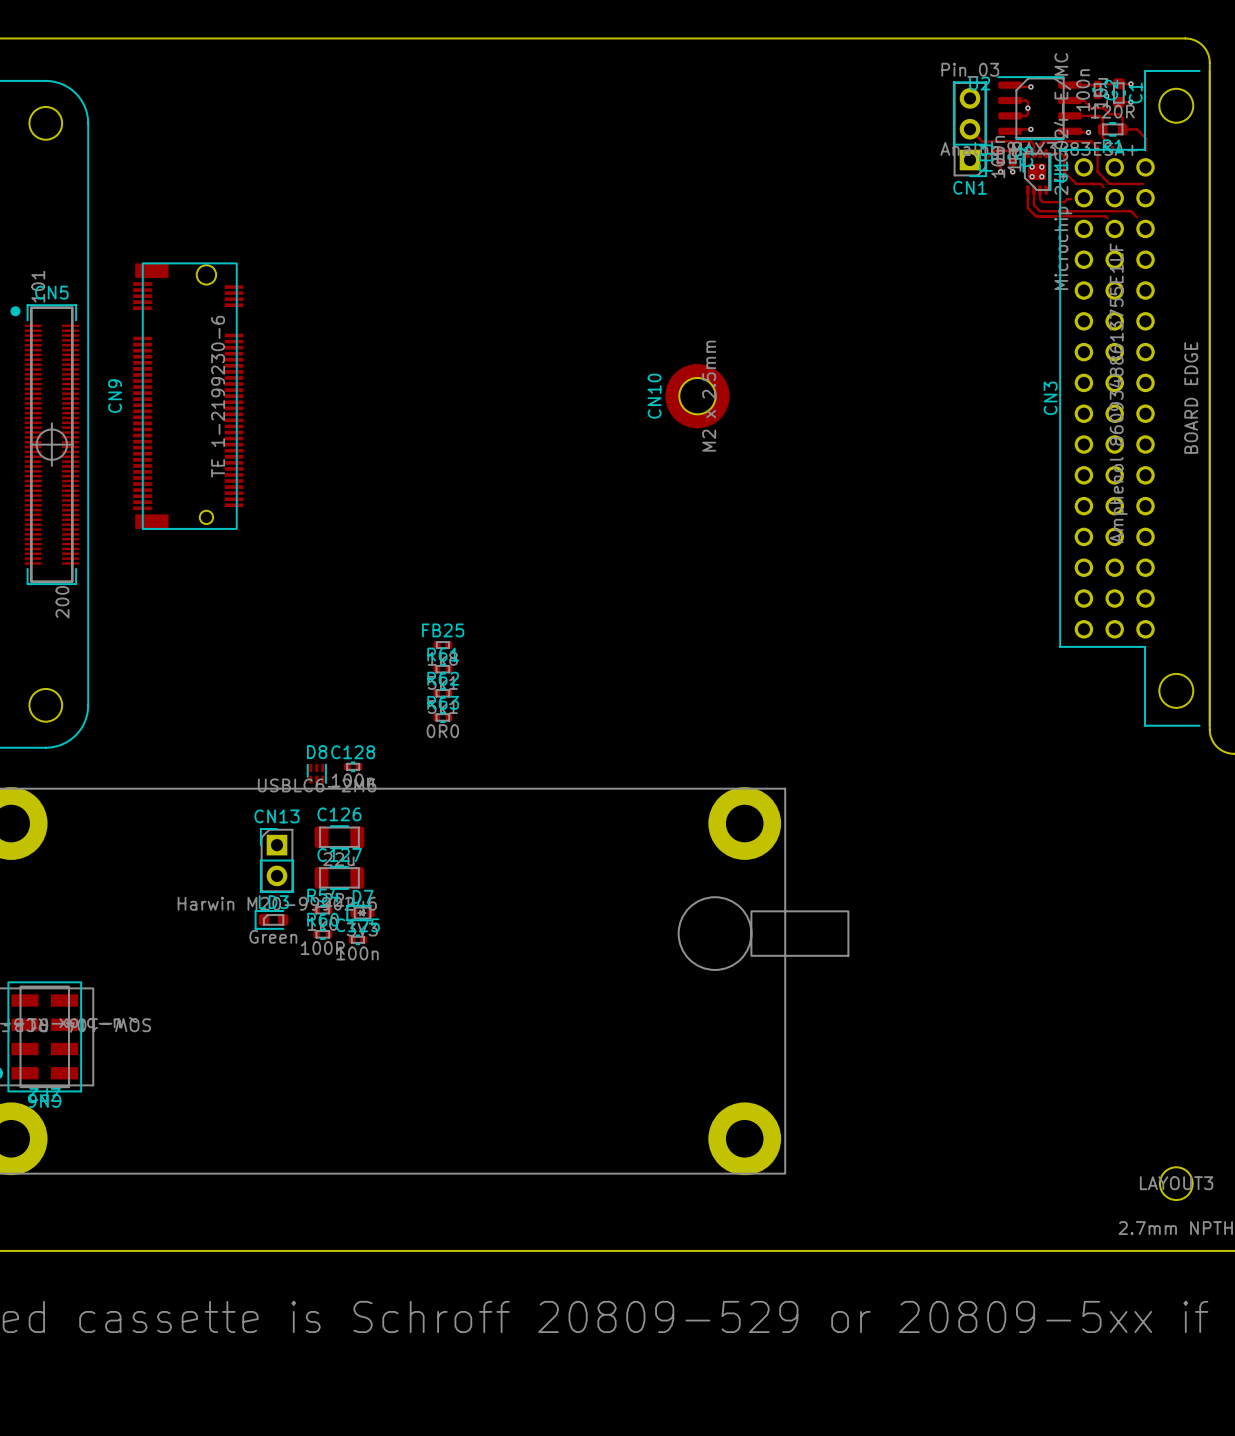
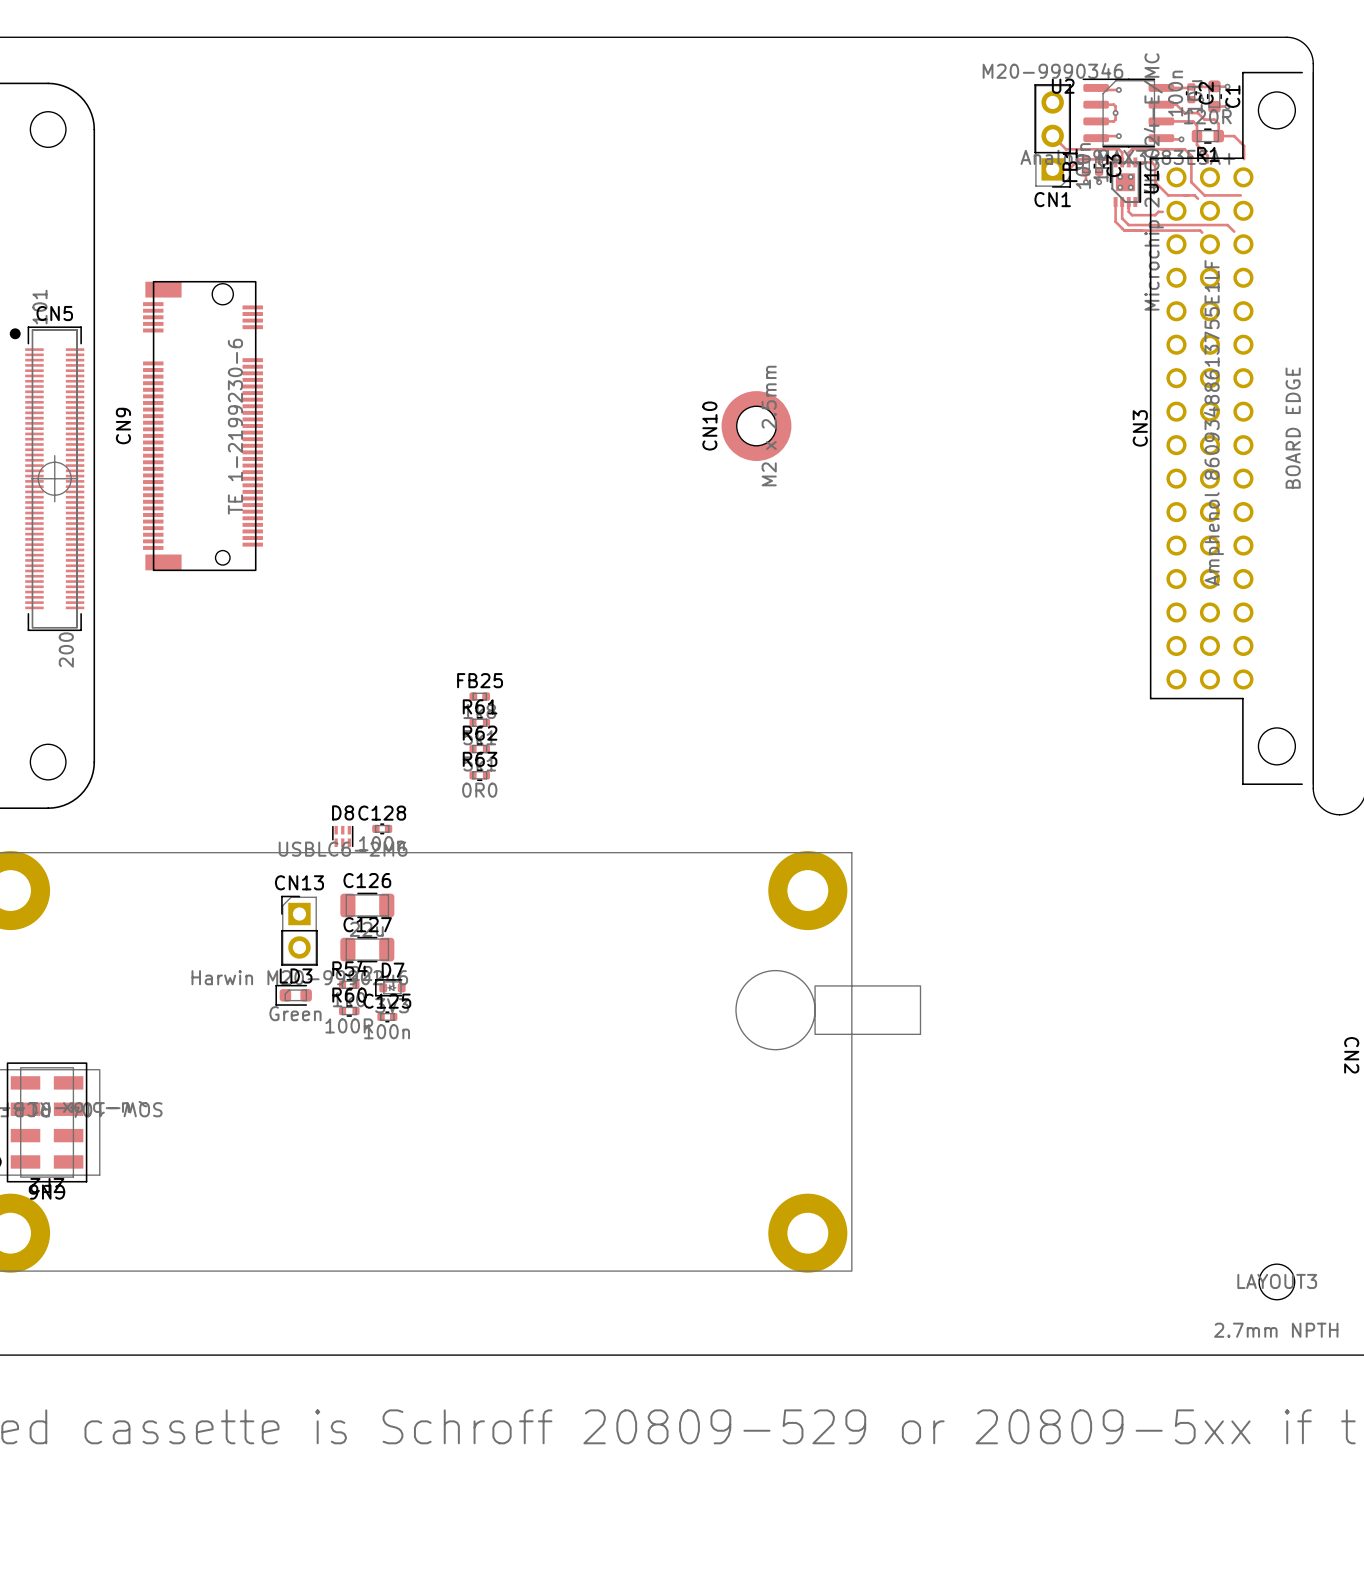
CN1 value: Pin_03 (970, 70) -> M20-9990346 (1052, 70)

